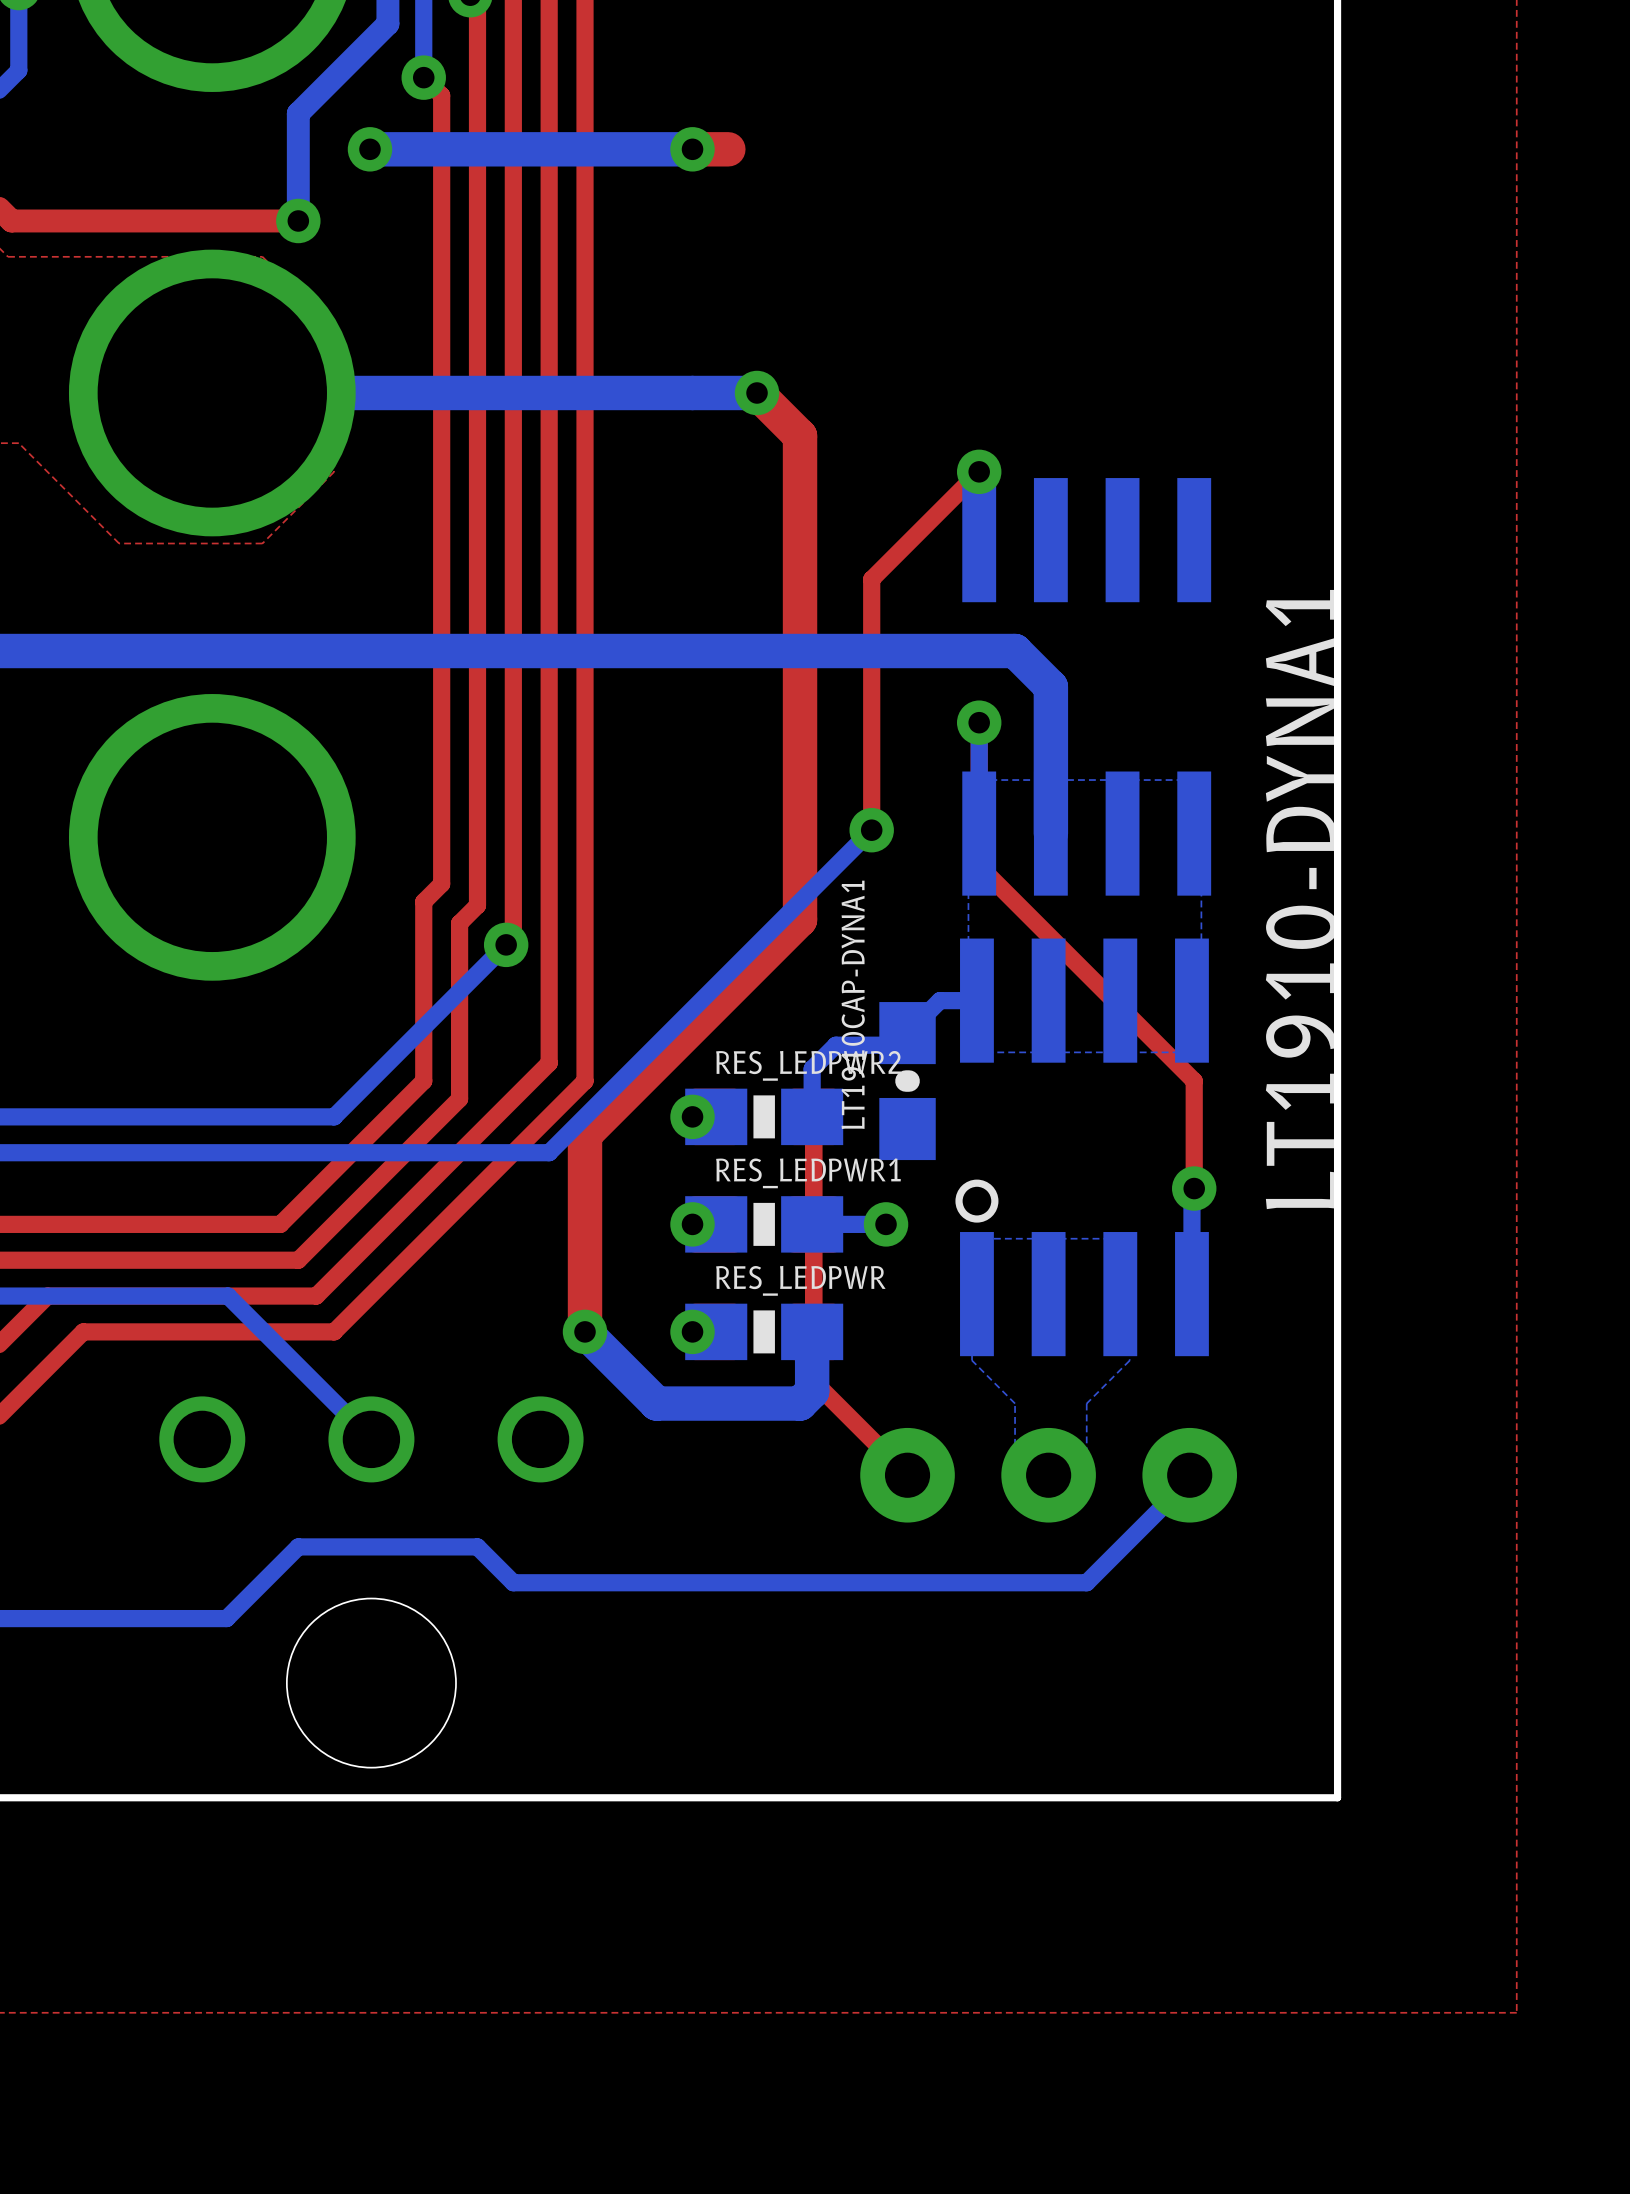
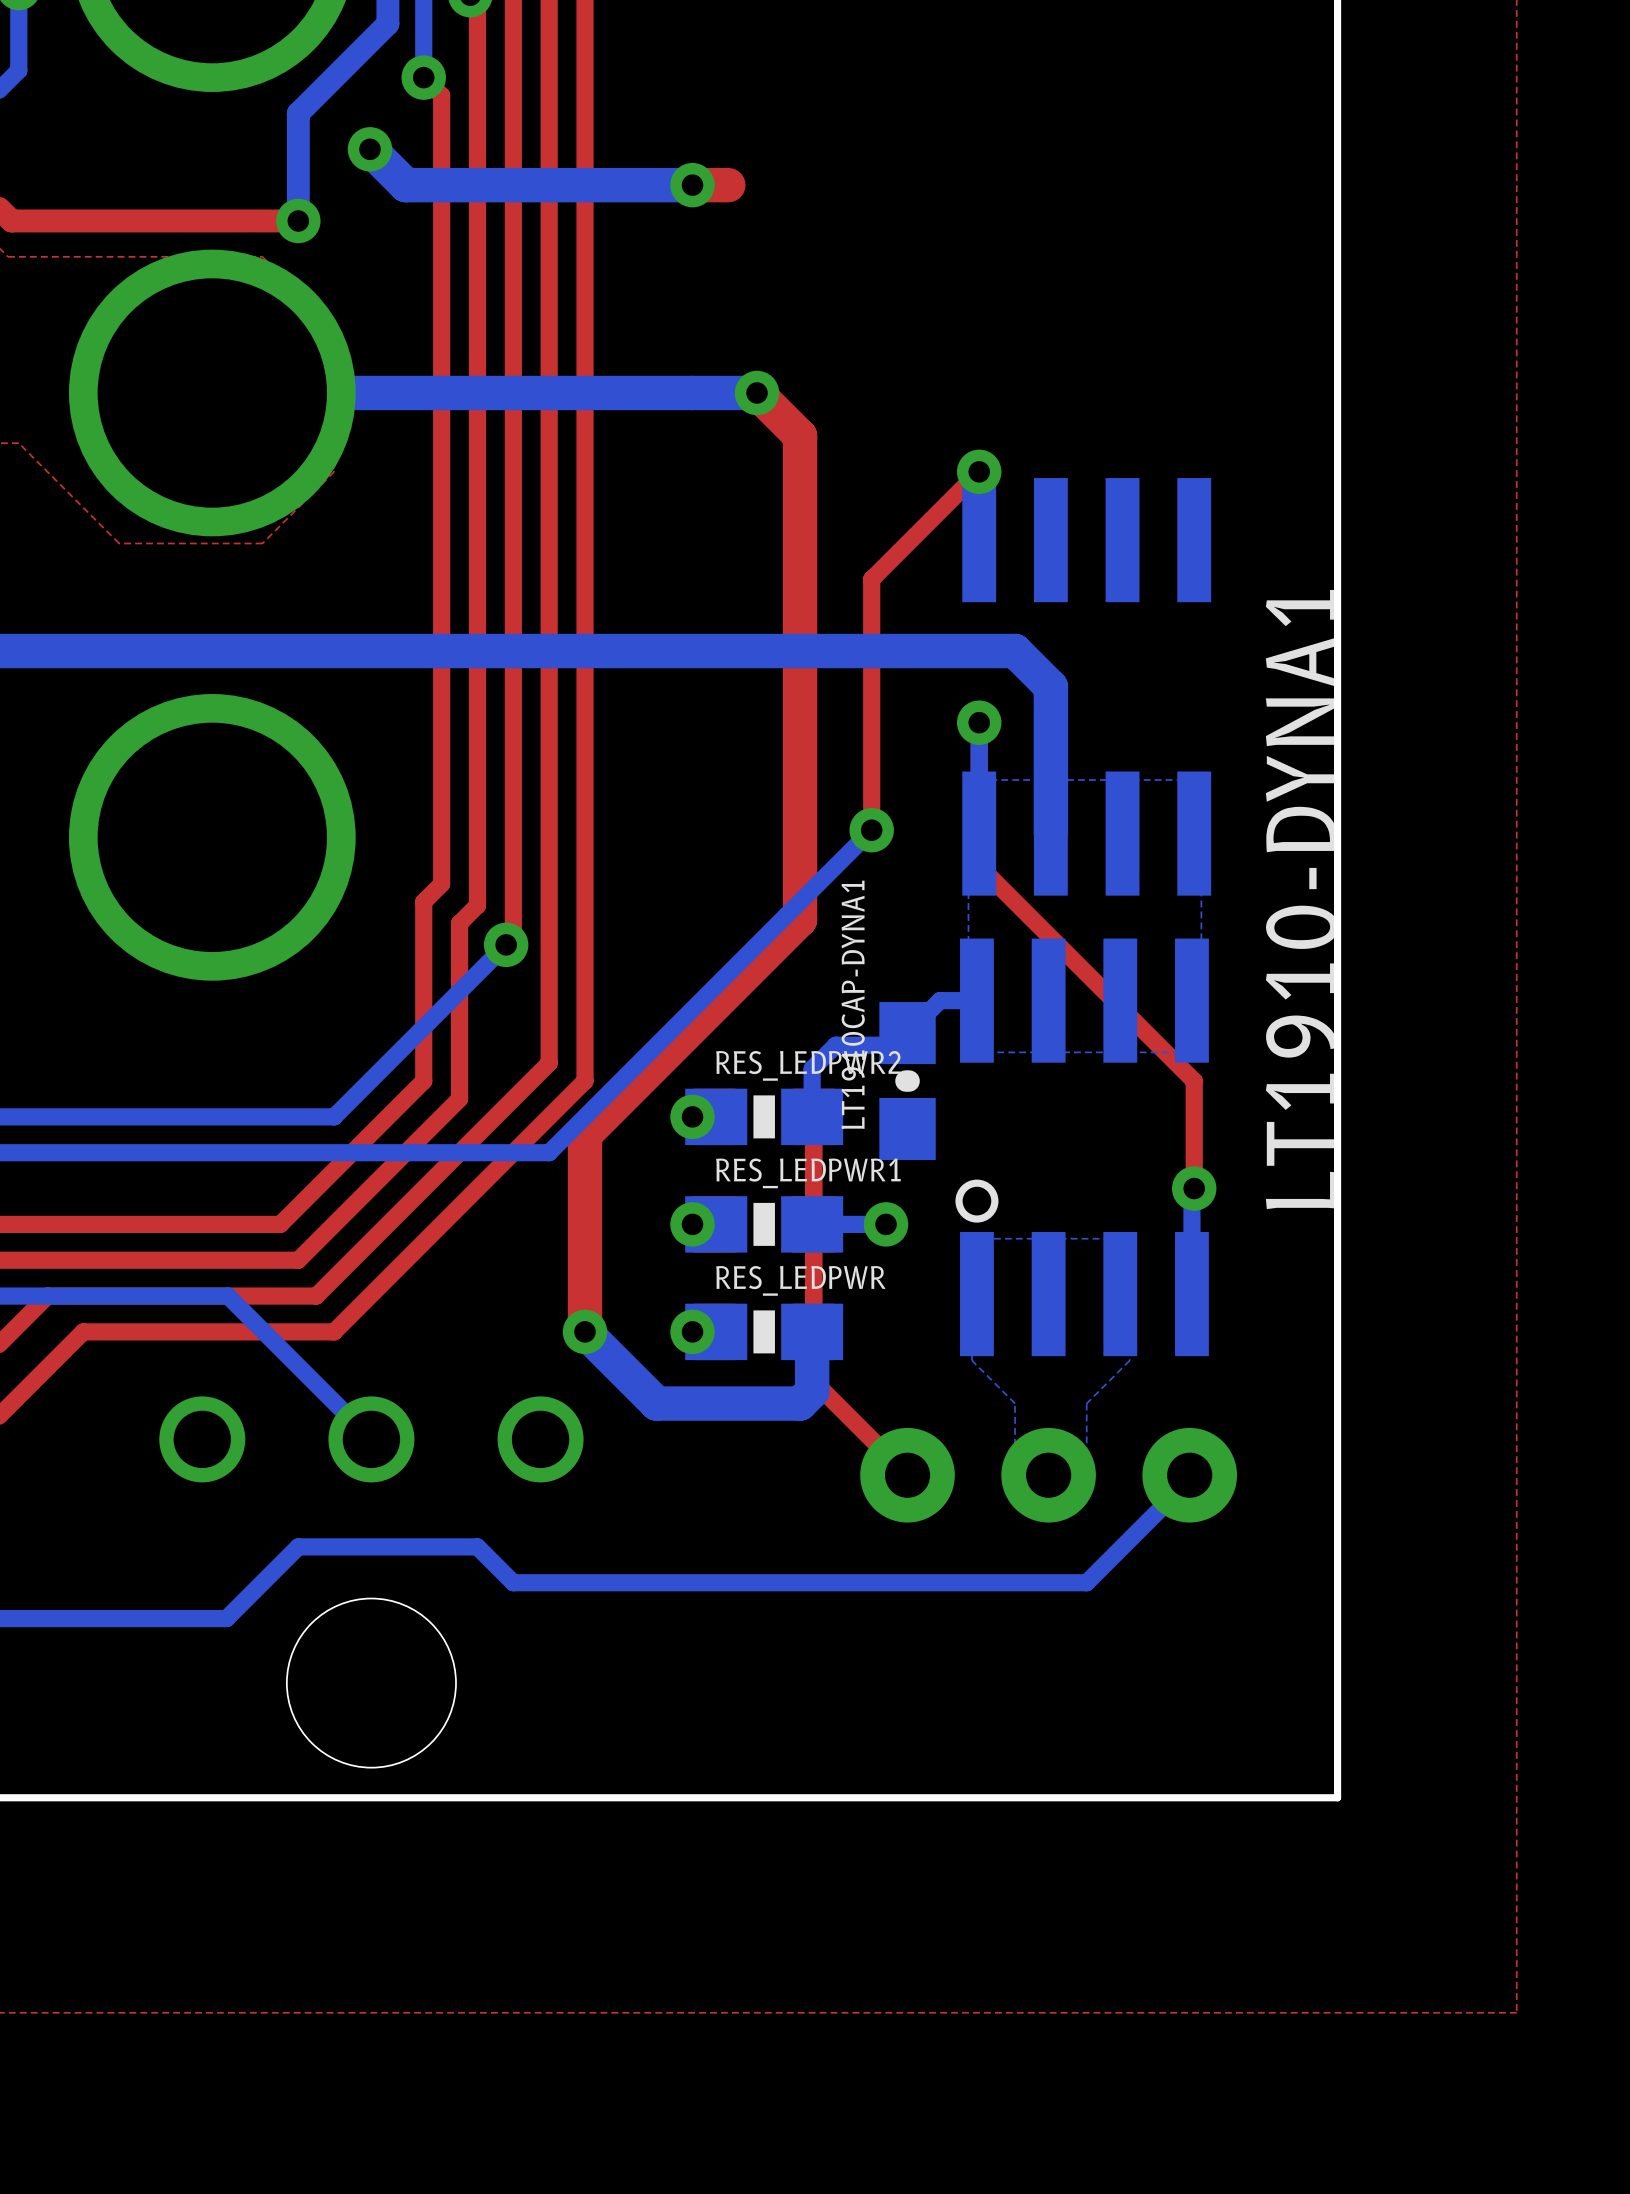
bottom track: (692, 149) (369, 149) -> (692, 185) (405, 185) (369, 149)
via position: (692, 149) -> (692, 185)
top track: (728, 149) (692, 149) -> (728, 185) (692, 185)

